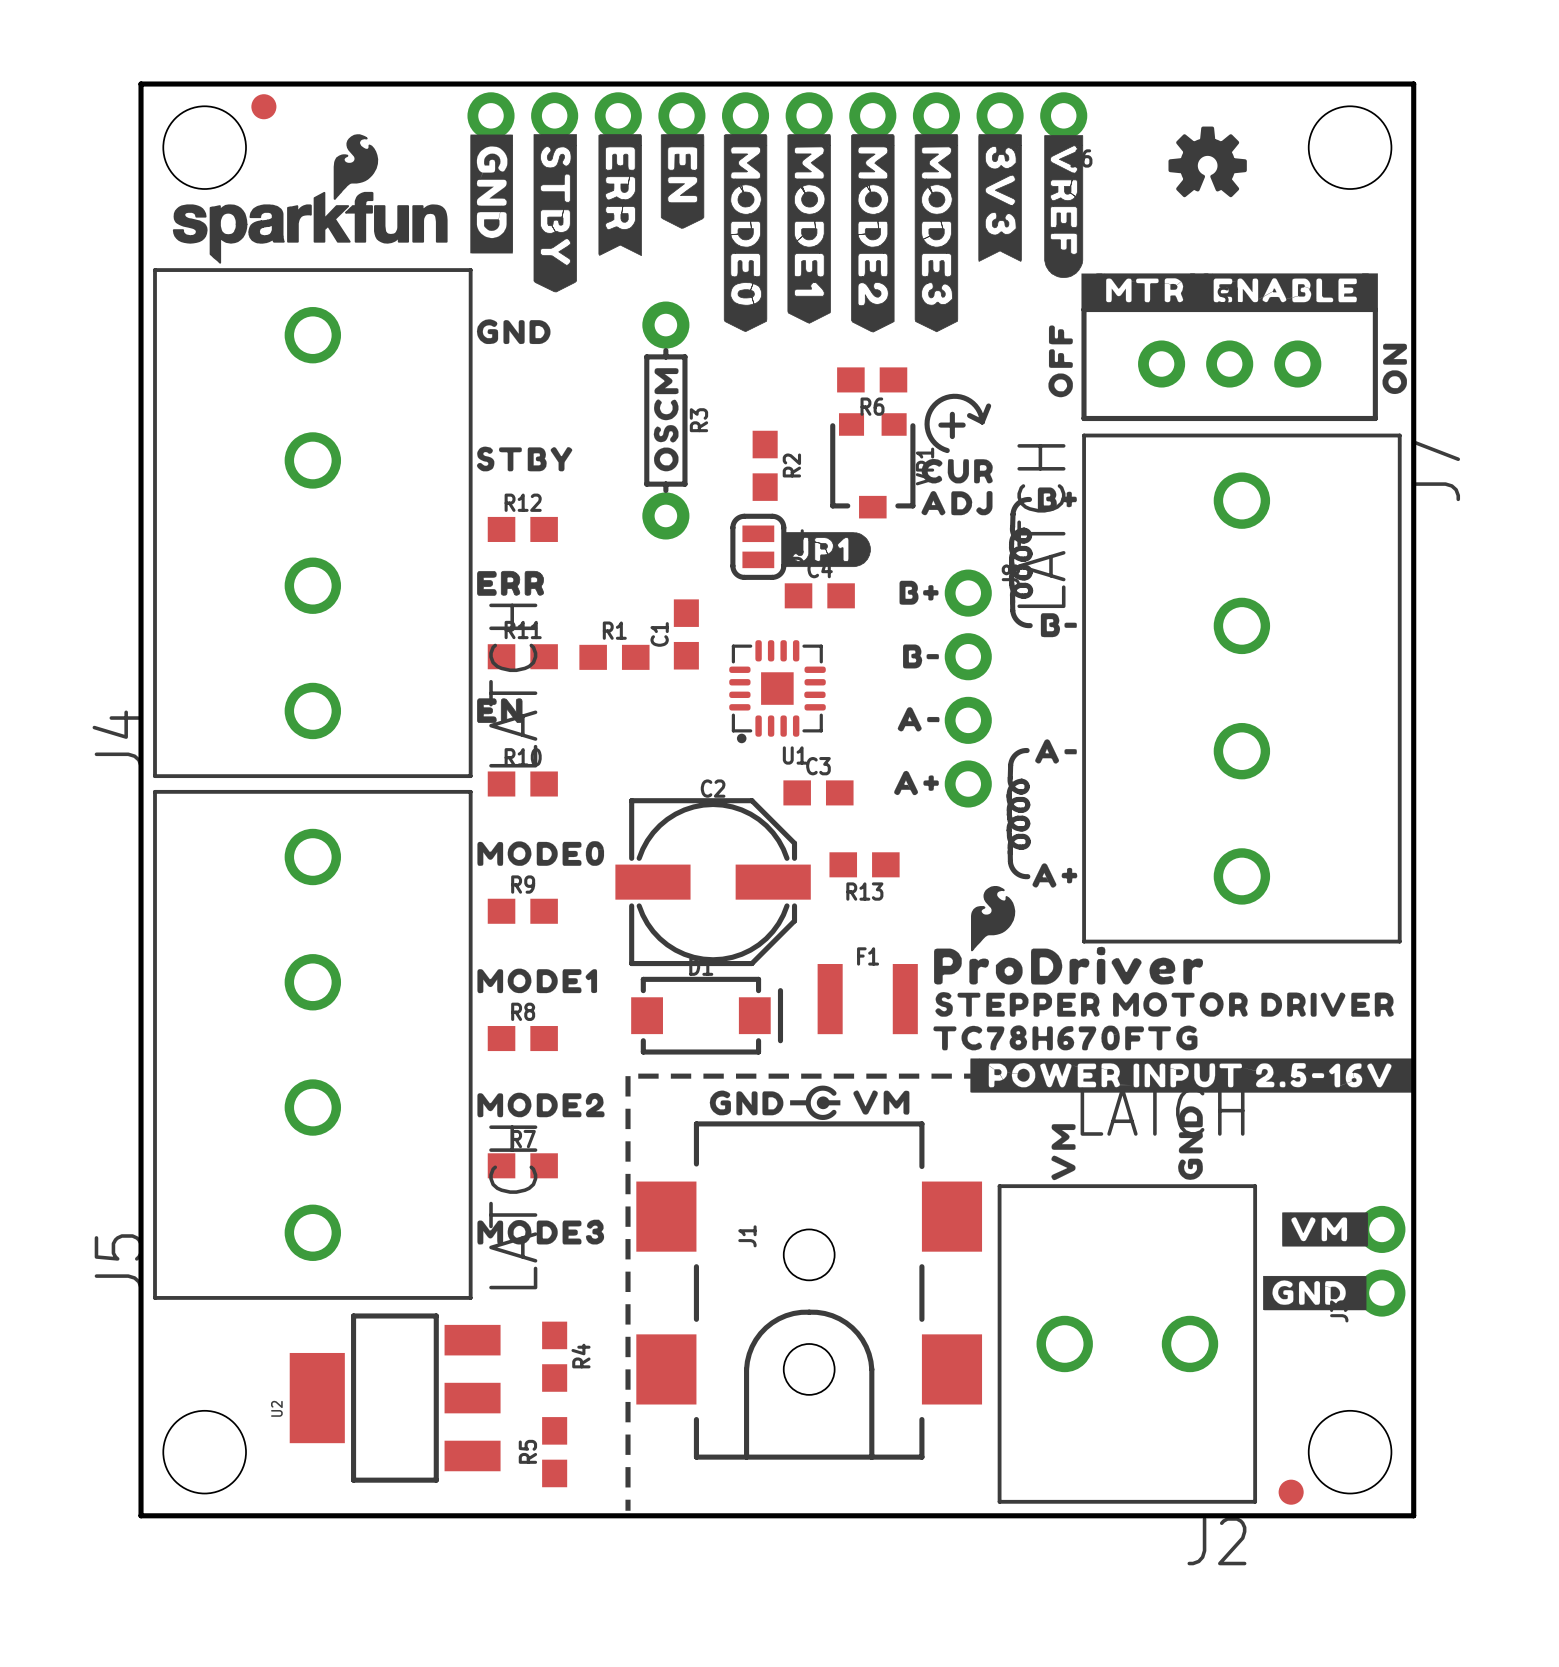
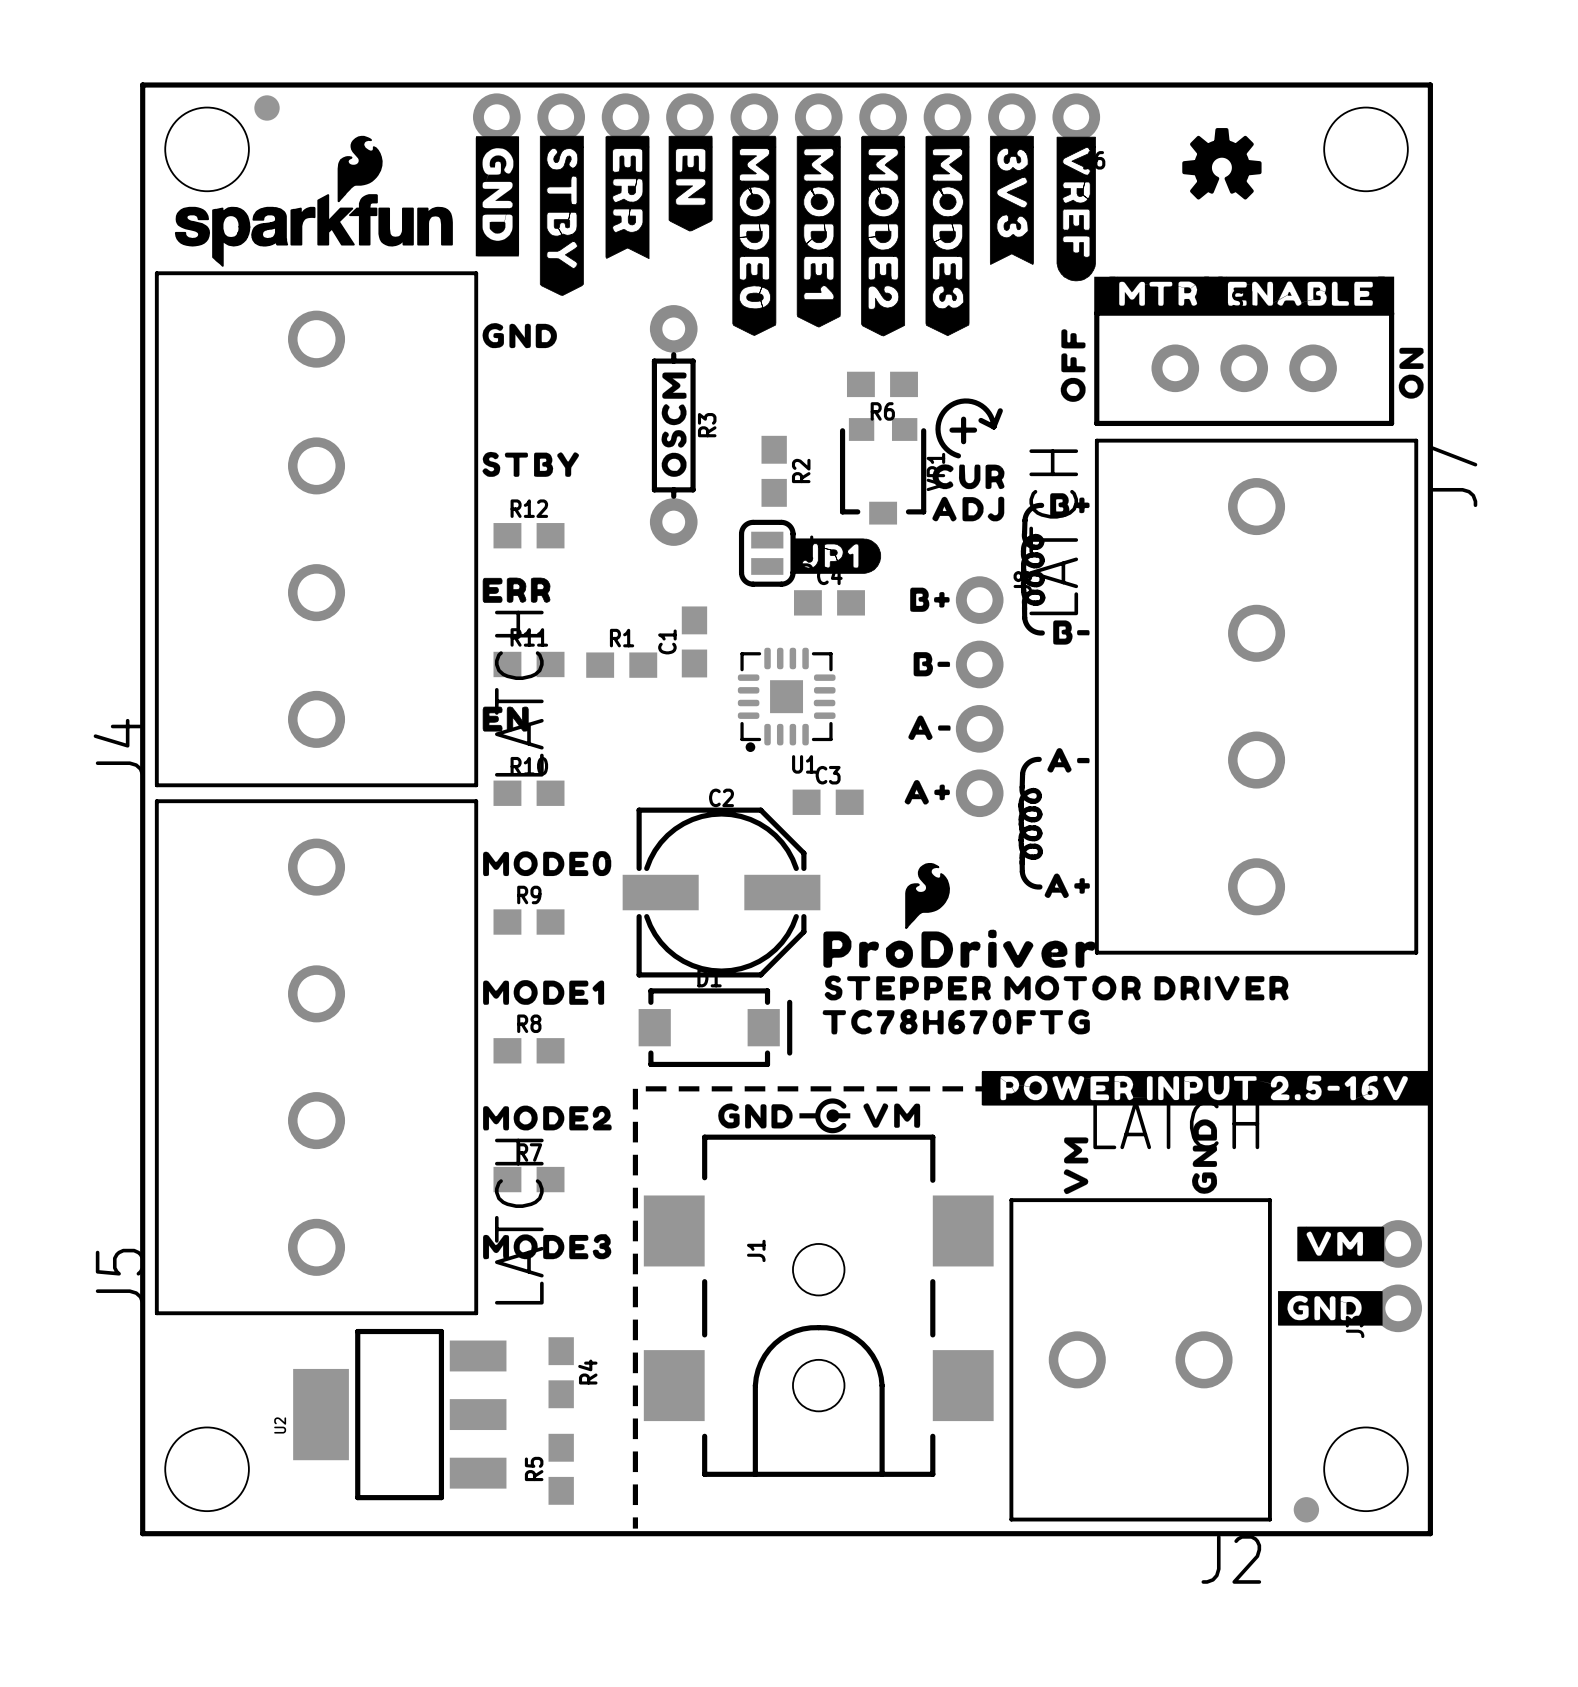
R13: (864, 864) -> none
drawing position: (993, 918) -> (927, 896)
drawing position: (1068, 965) -> (959, 948)
F1: (867, 999) -> none
drawing position: (1164, 1004) -> (1056, 987)
drawing position: (1065, 1037) -> (956, 1021)

